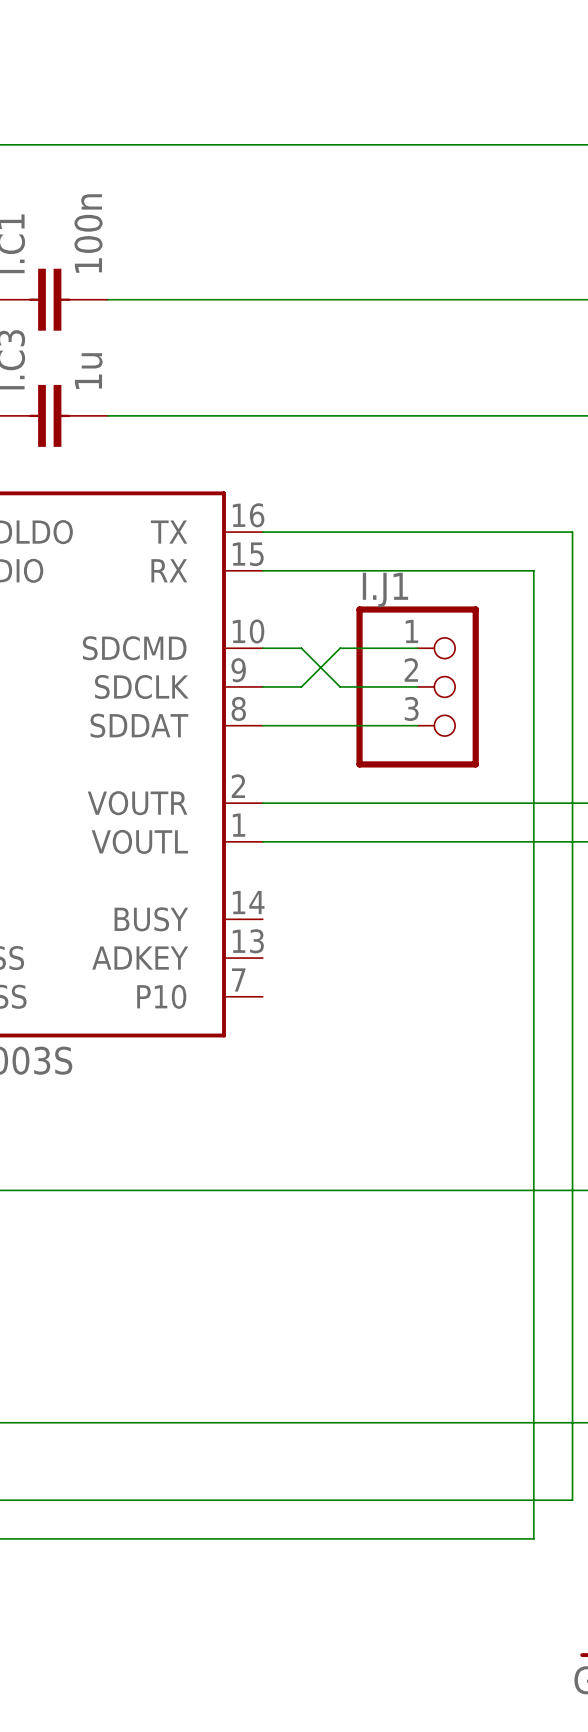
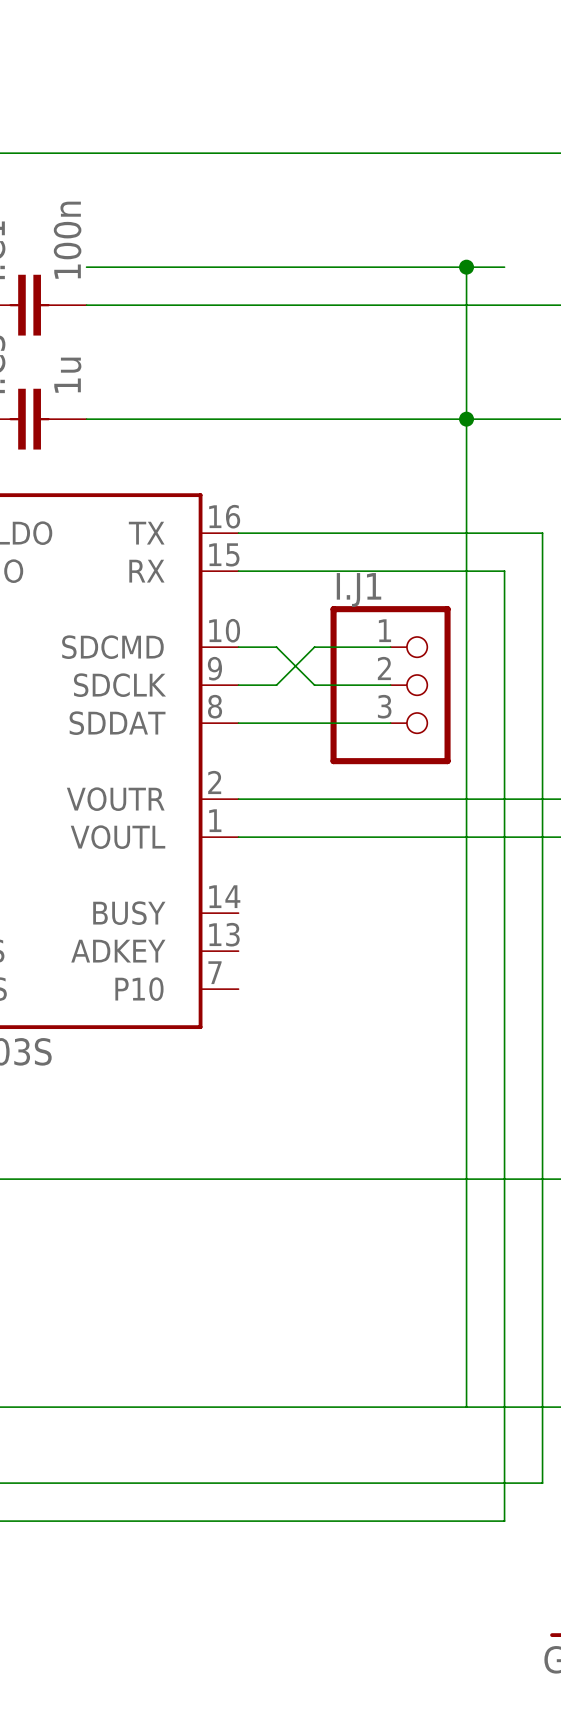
wire: none -> (86, 267) (504, 267)
wire: none -> (466, 267) (466, 1407)
junction: none -> (466, 267)
junction: none -> (466, 419)

